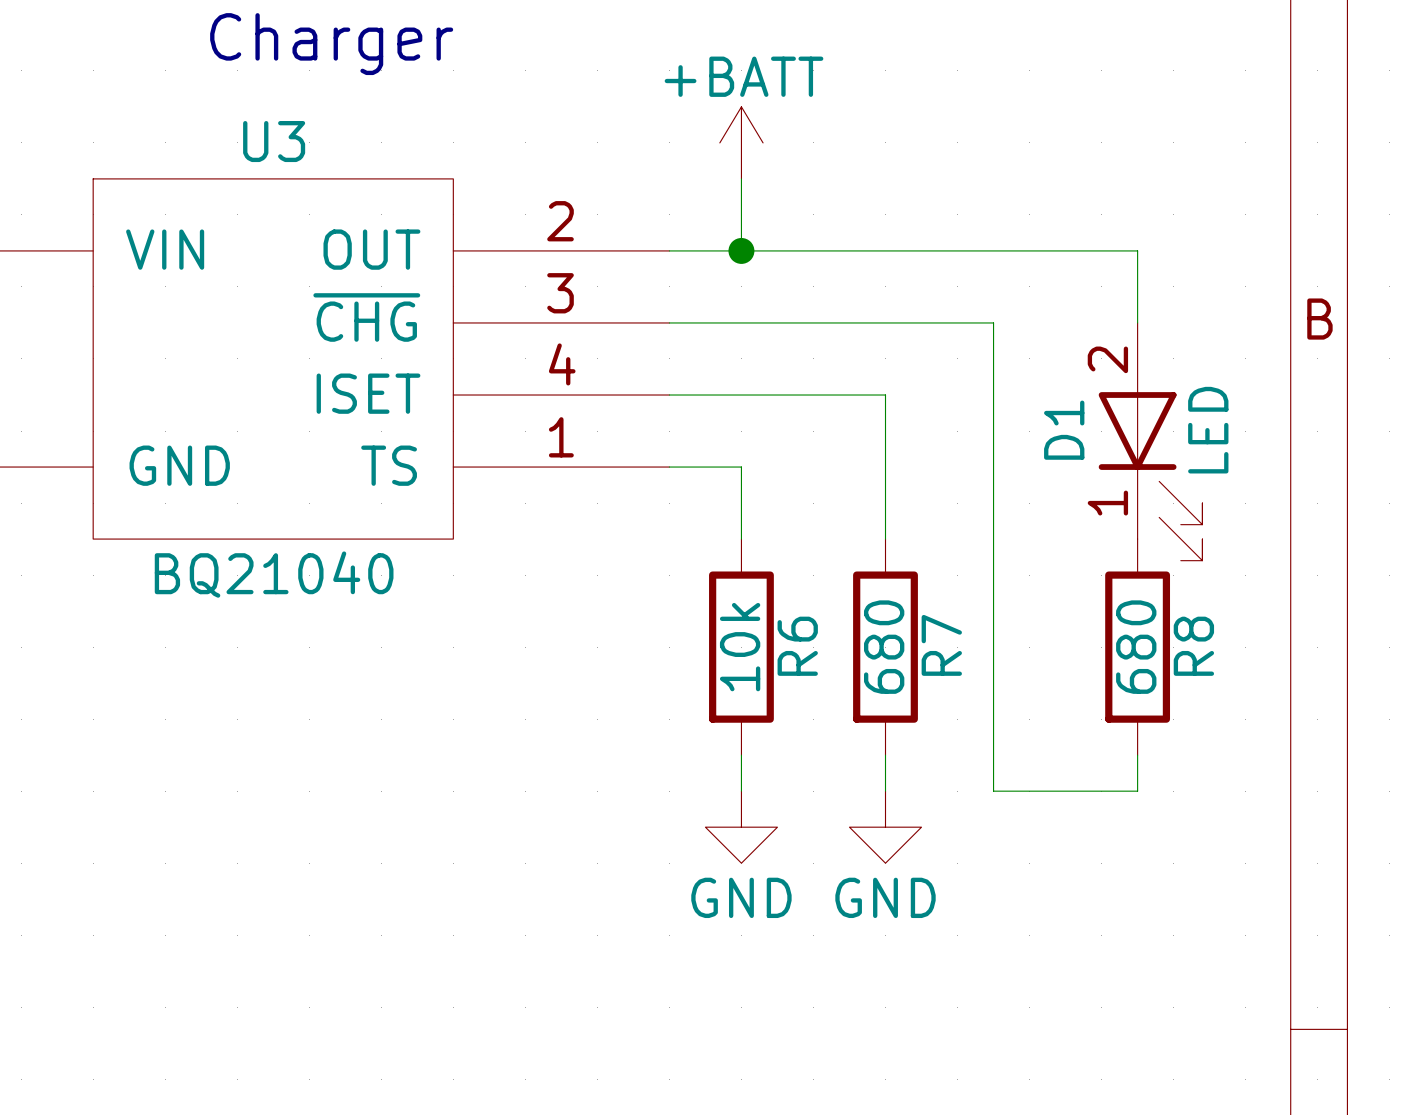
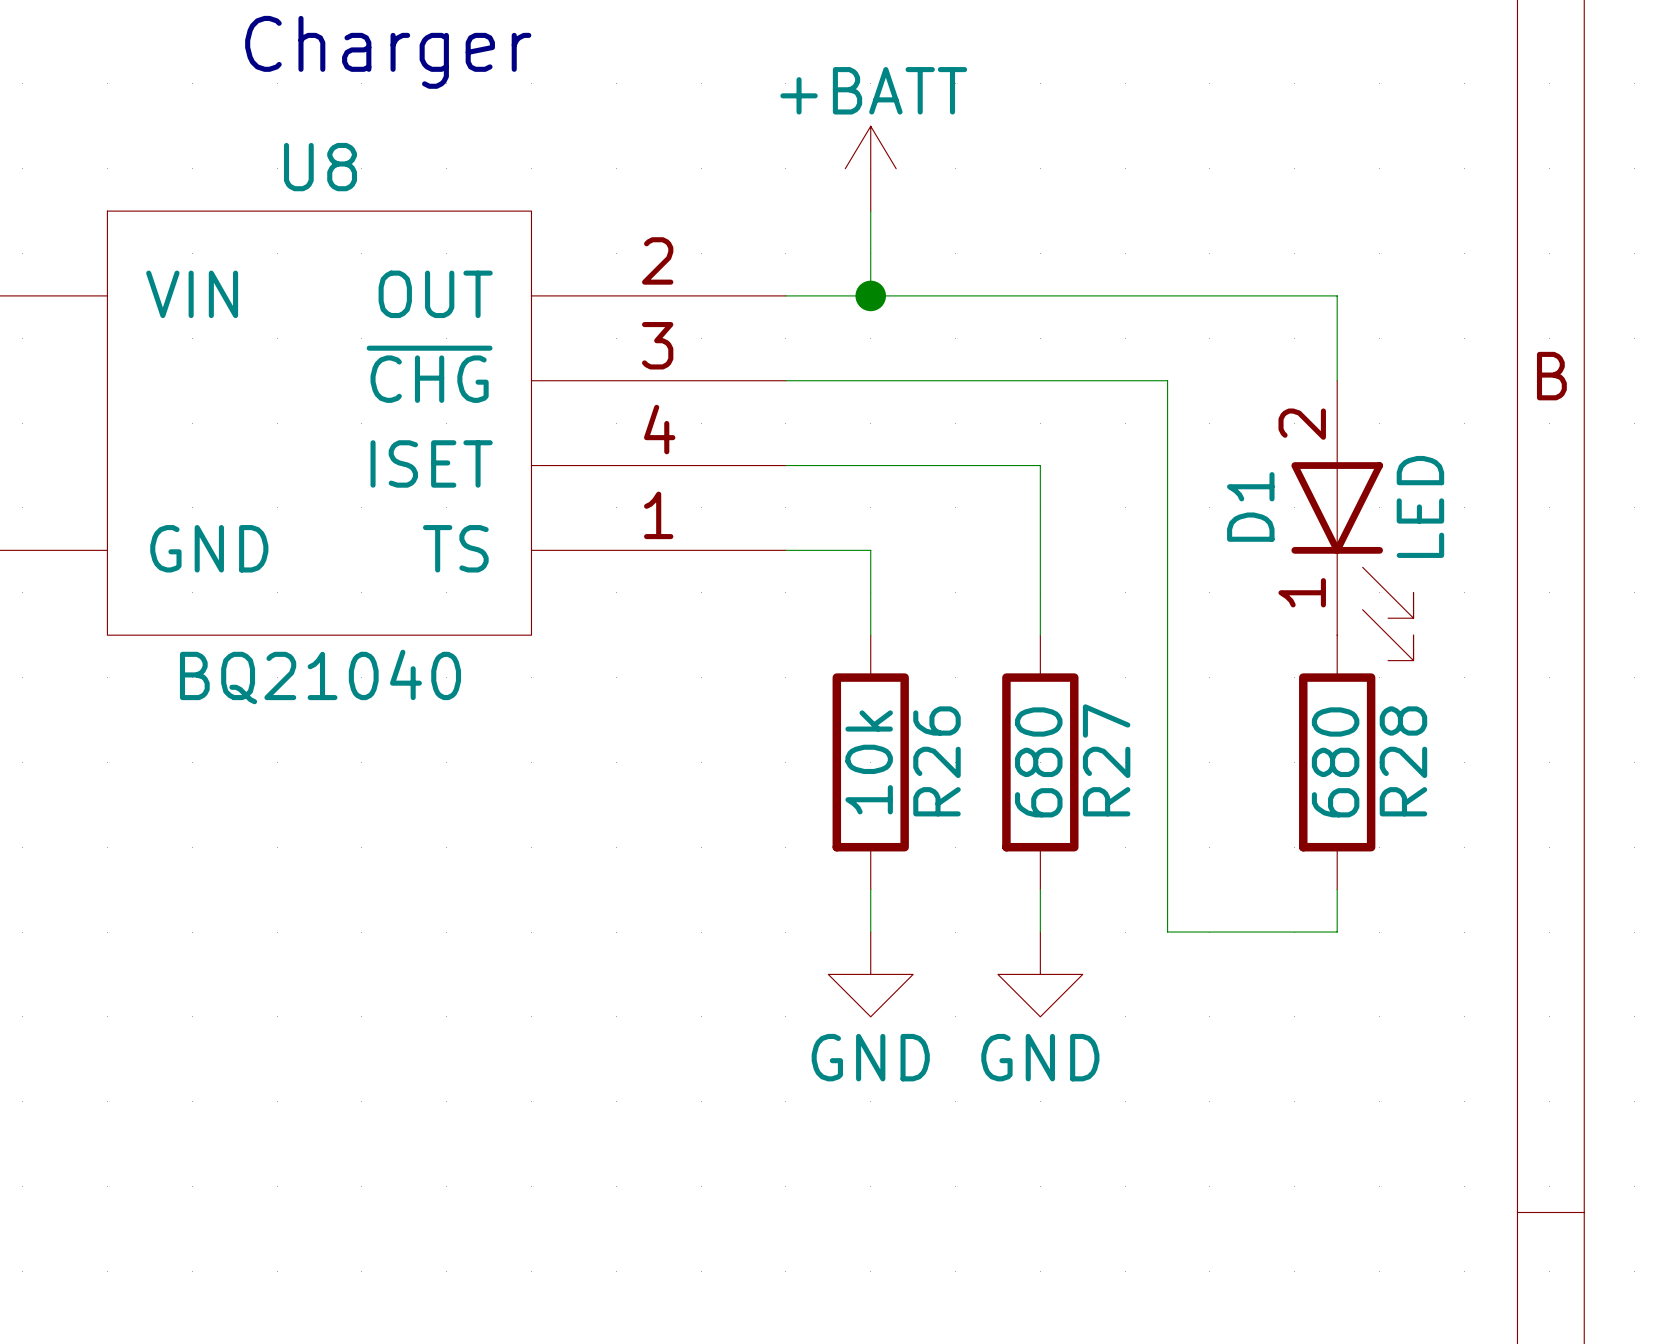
U3 name: U3 (274, 141) -> U8 (320, 167)
R7 name: R7 (941, 645) -> R27 (1106, 760)
R6 name: R6 (797, 646) -> R26 (936, 761)
R8 name: R8 (1193, 646) -> R28 (1403, 761)

